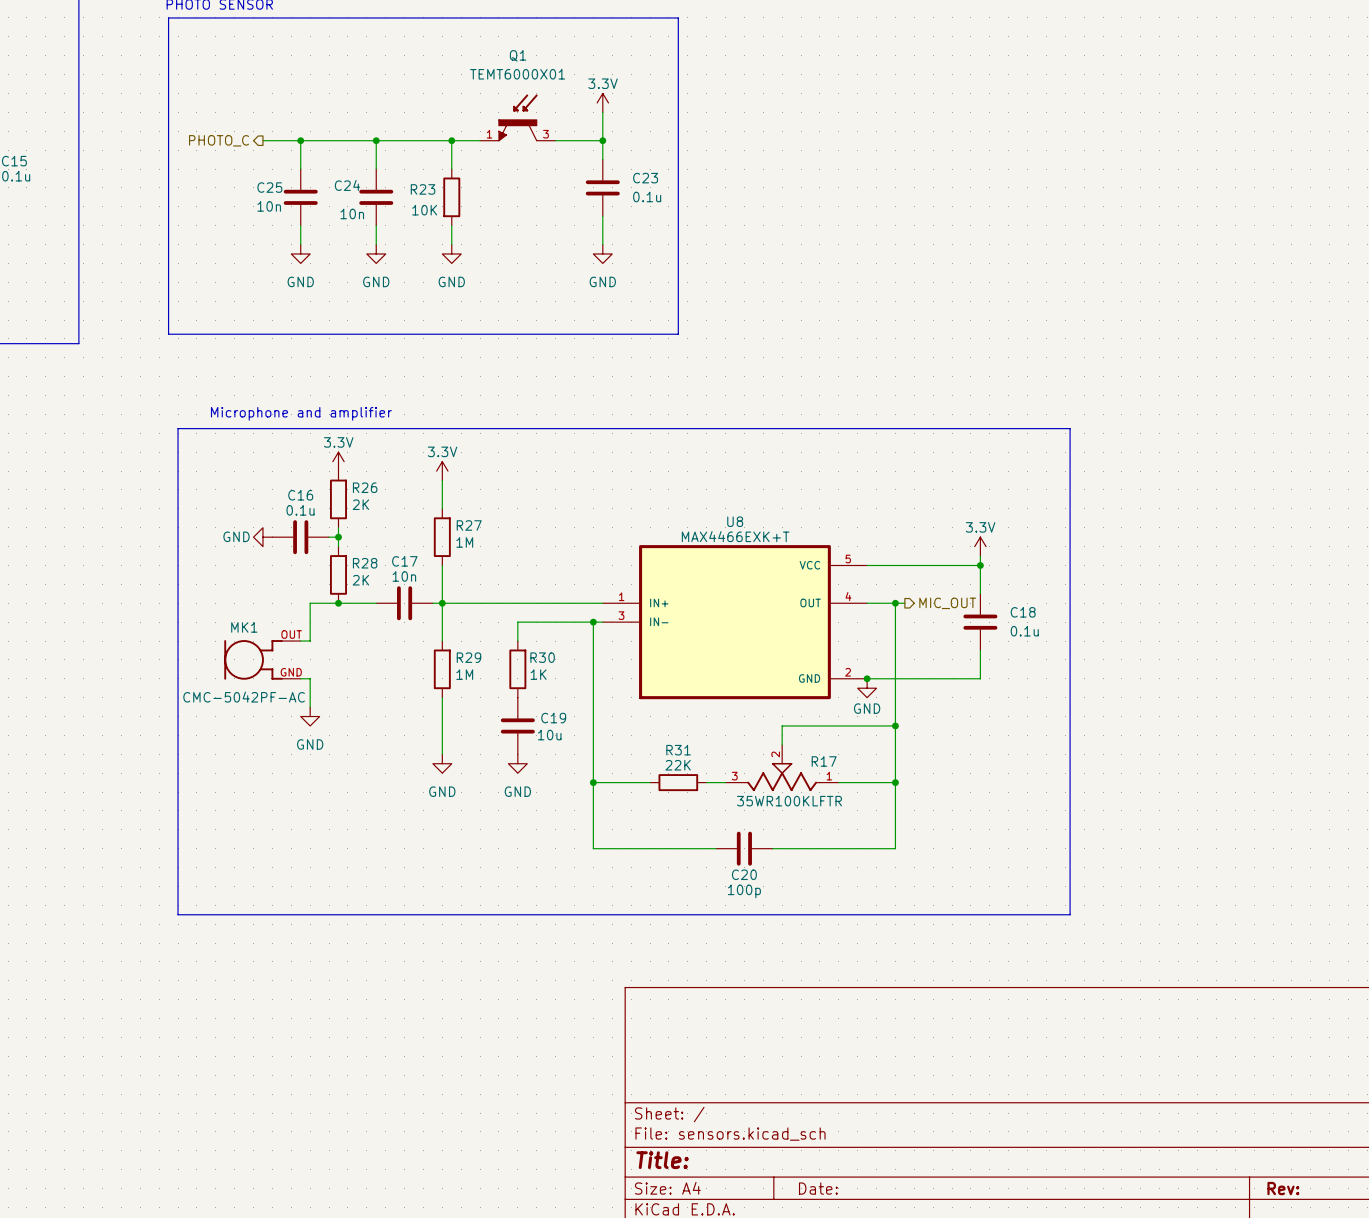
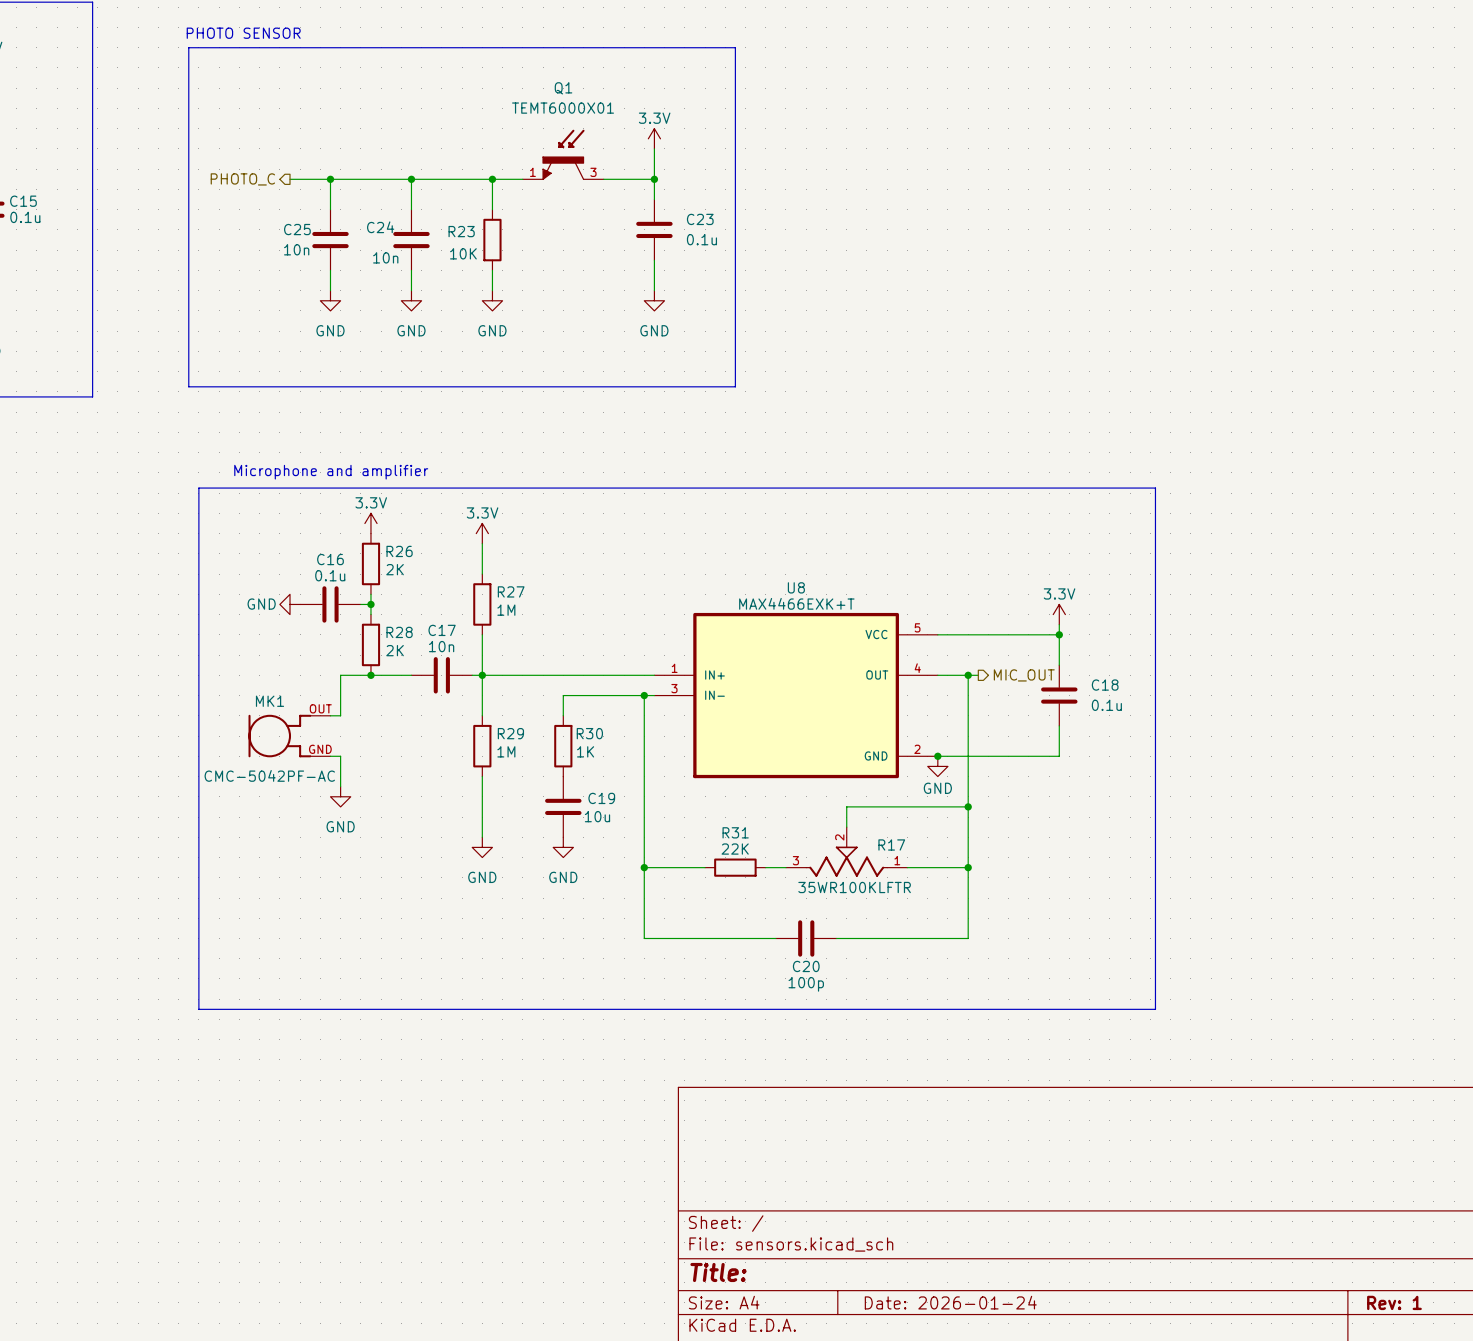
title block: Date: (818, 1188) -> Date: 2026-01-24 (950, 1302)
title block: Rev: (1283, 1188) -> Rev: 1 (1394, 1302)

